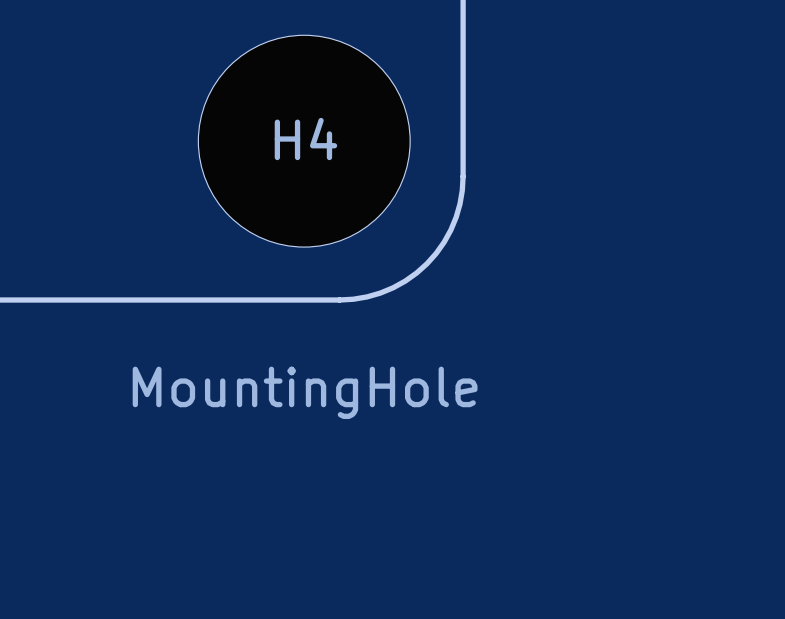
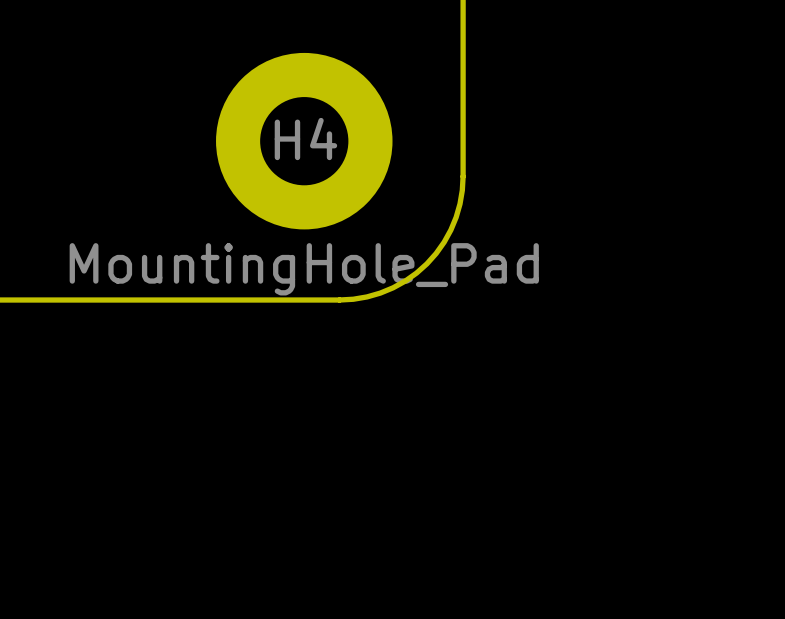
H4 footprint: [198, 35, 411, 248] -> [216, 52, 393, 230]
H4 value: MountingHole (305, 392) -> MountingHole_Pad (304, 269)

